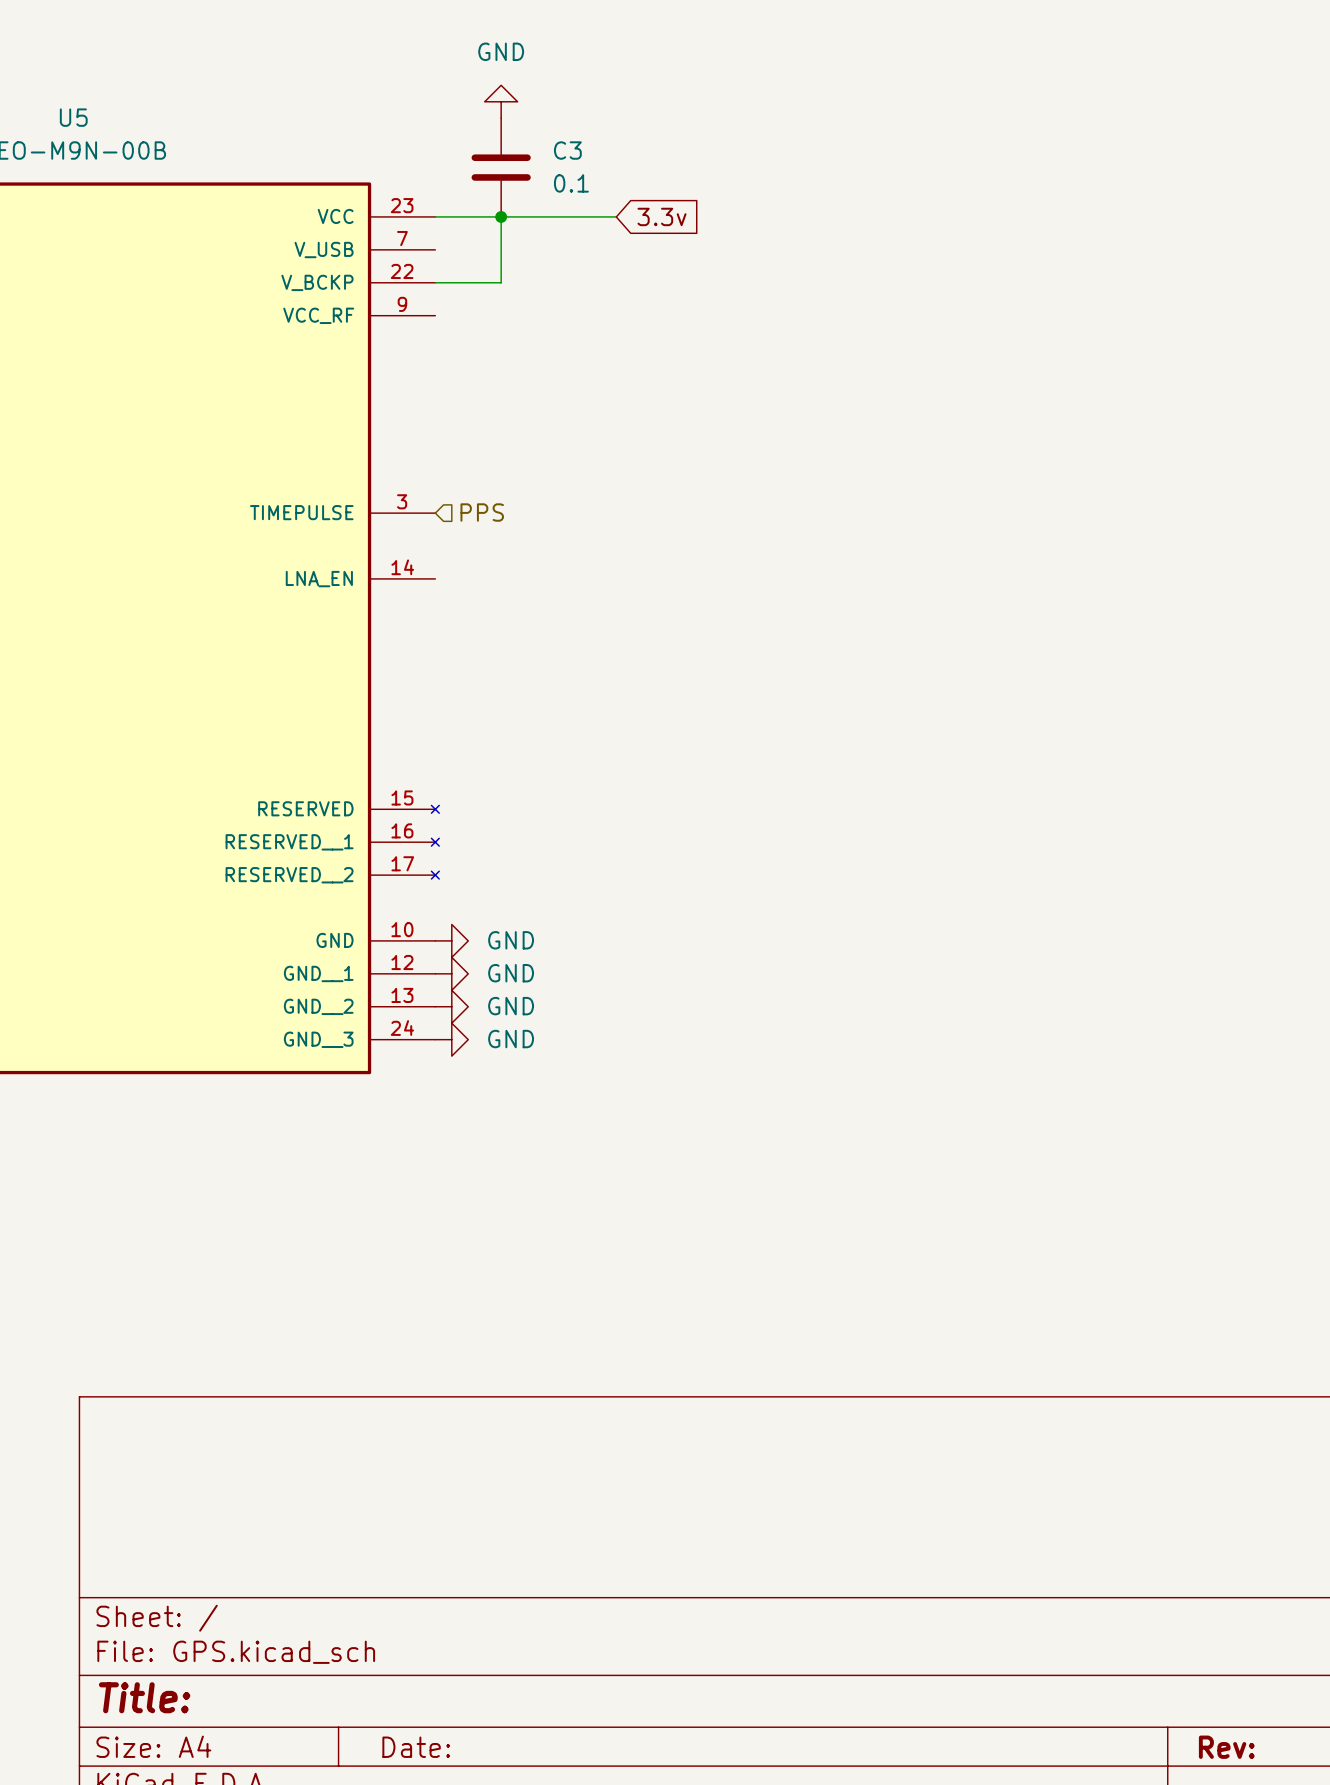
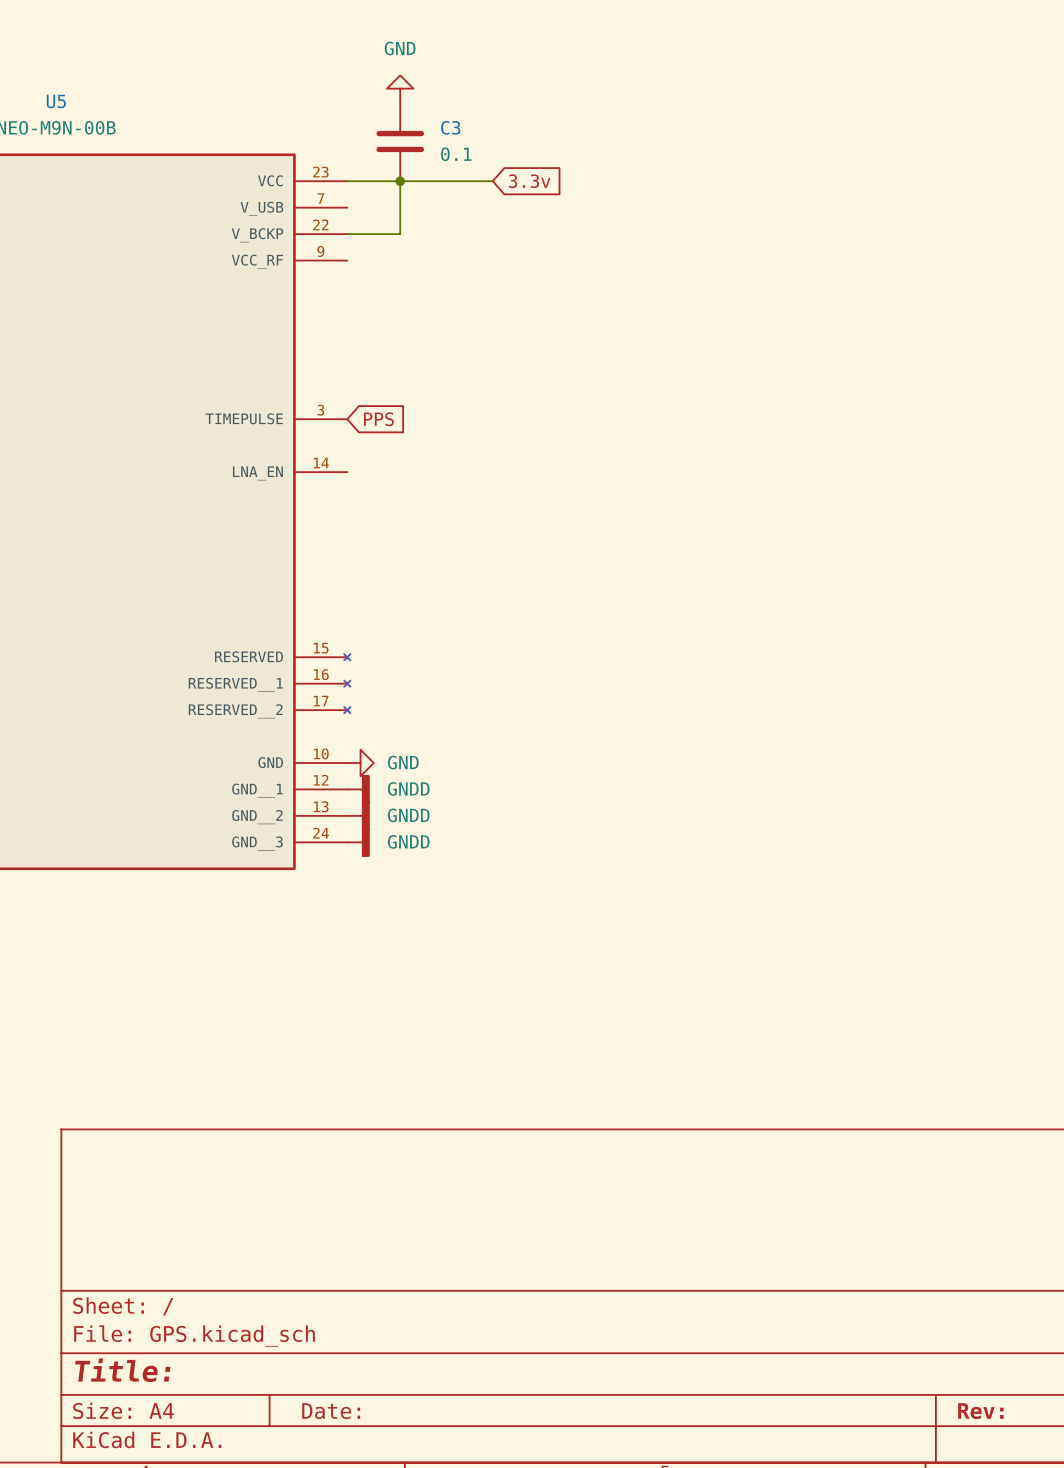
hierarchical label: PPS (482, 512) -> none
global label: none -> PPS (378, 419)
power symbol: GND (451, 973) -> GNDD (358, 789)
power symbol: GND (451, 1006) -> GNDD (358, 815)
power symbol: GND (451, 1039) -> GNDD (358, 842)

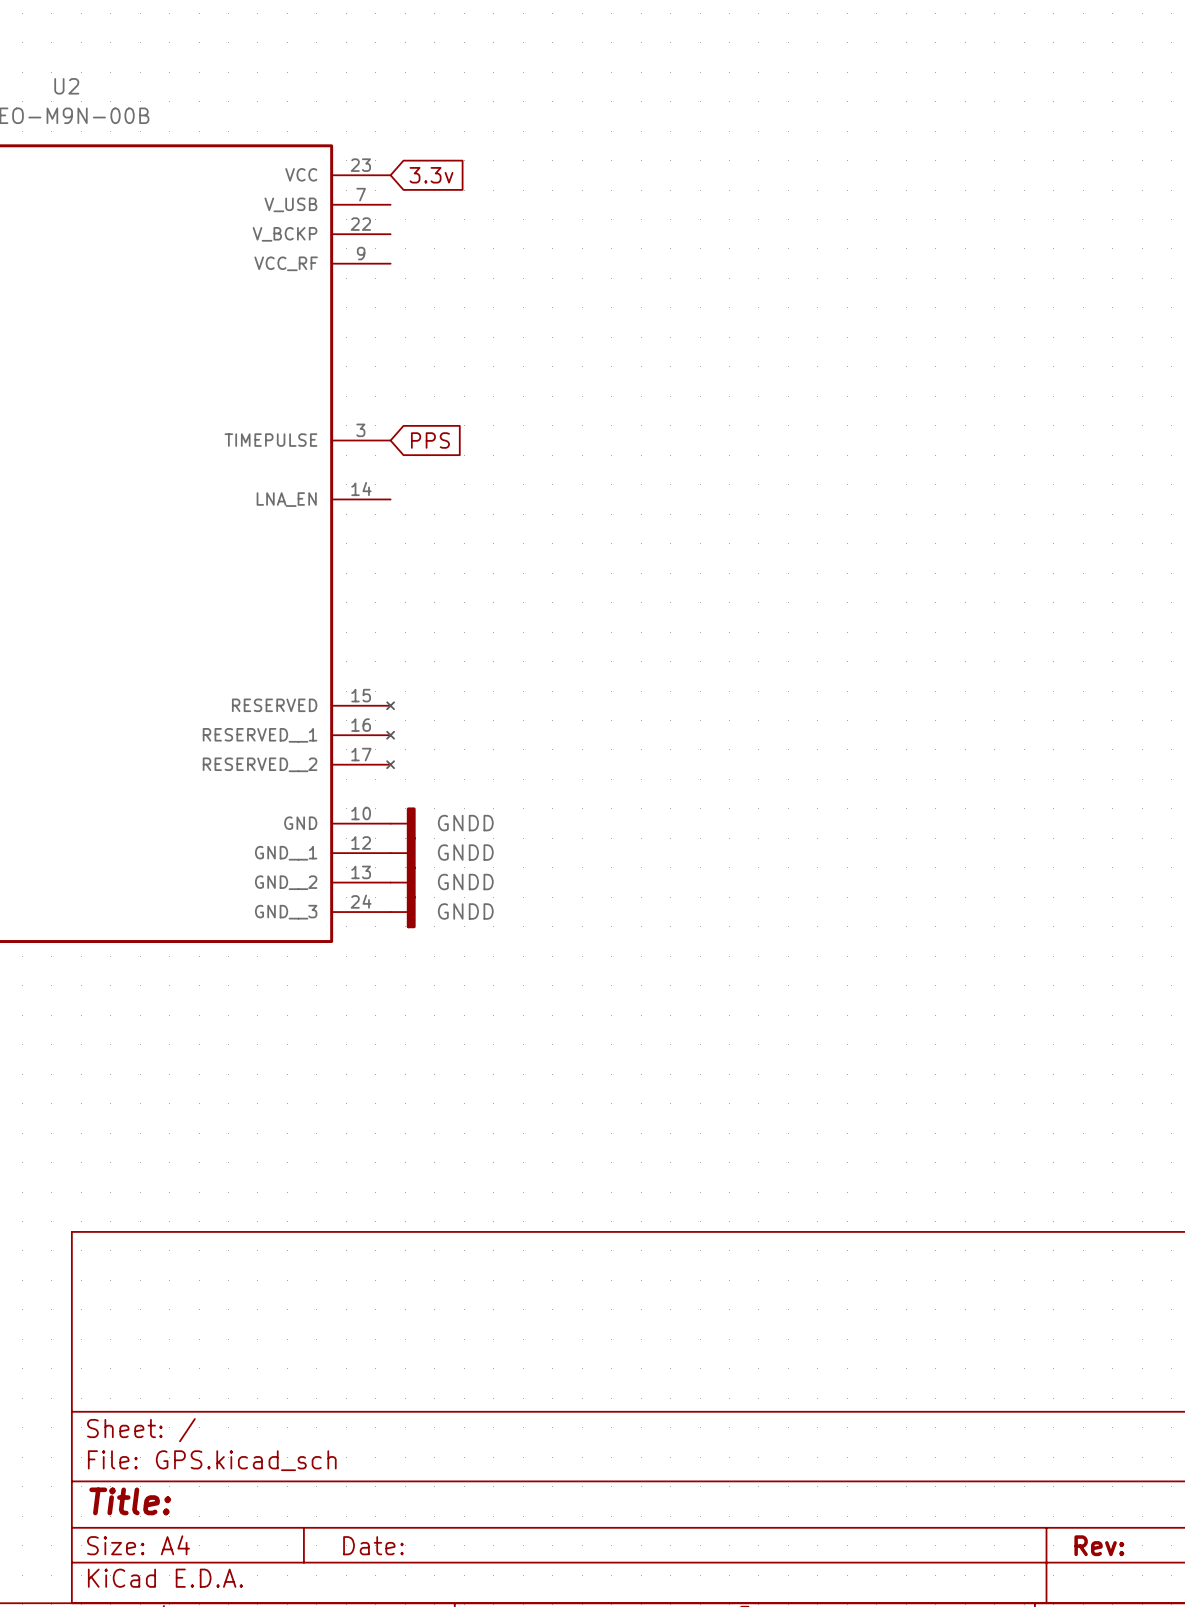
power symbol: GND (400, 88) -> none
U5 name: U5 (56, 101) -> U2 (66, 86)
C3: 0.1 (400, 141) -> none
wire: (347, 181) (492, 181) -> none
wire: (400, 181) (400, 234) (347, 234) -> none
junction: (400, 181) -> none
global label position: 3.3v (529, 181) -> 3.3v (431, 175)
power symbol: GND (360, 763) -> GNDD (403, 823)

